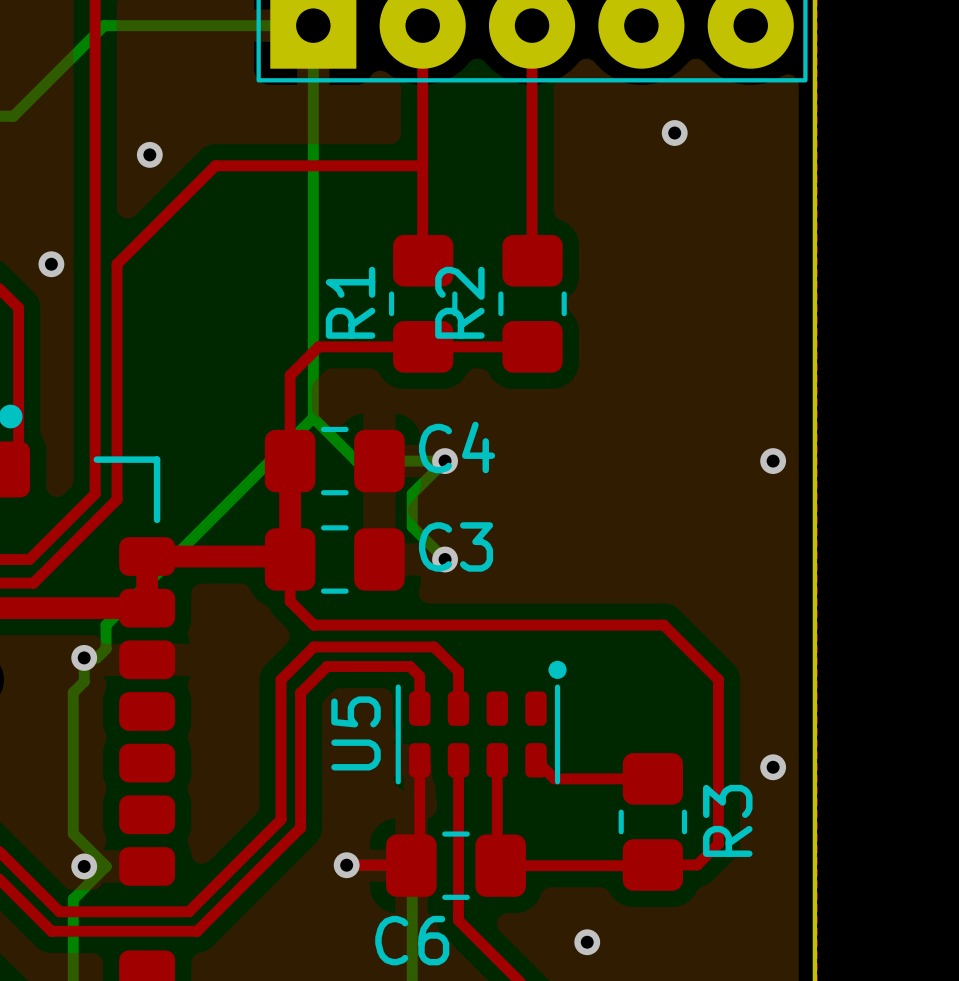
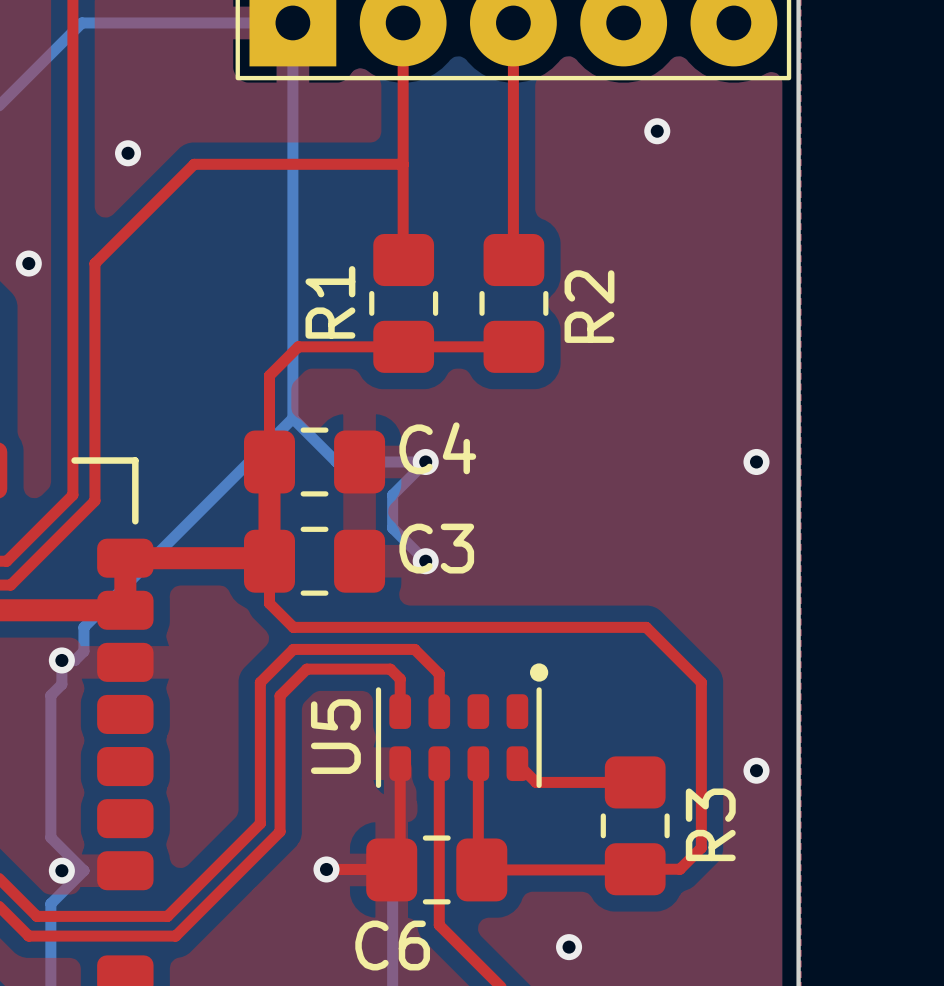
R2 name position: R2 (459, 302) -> R2 (589, 306)

